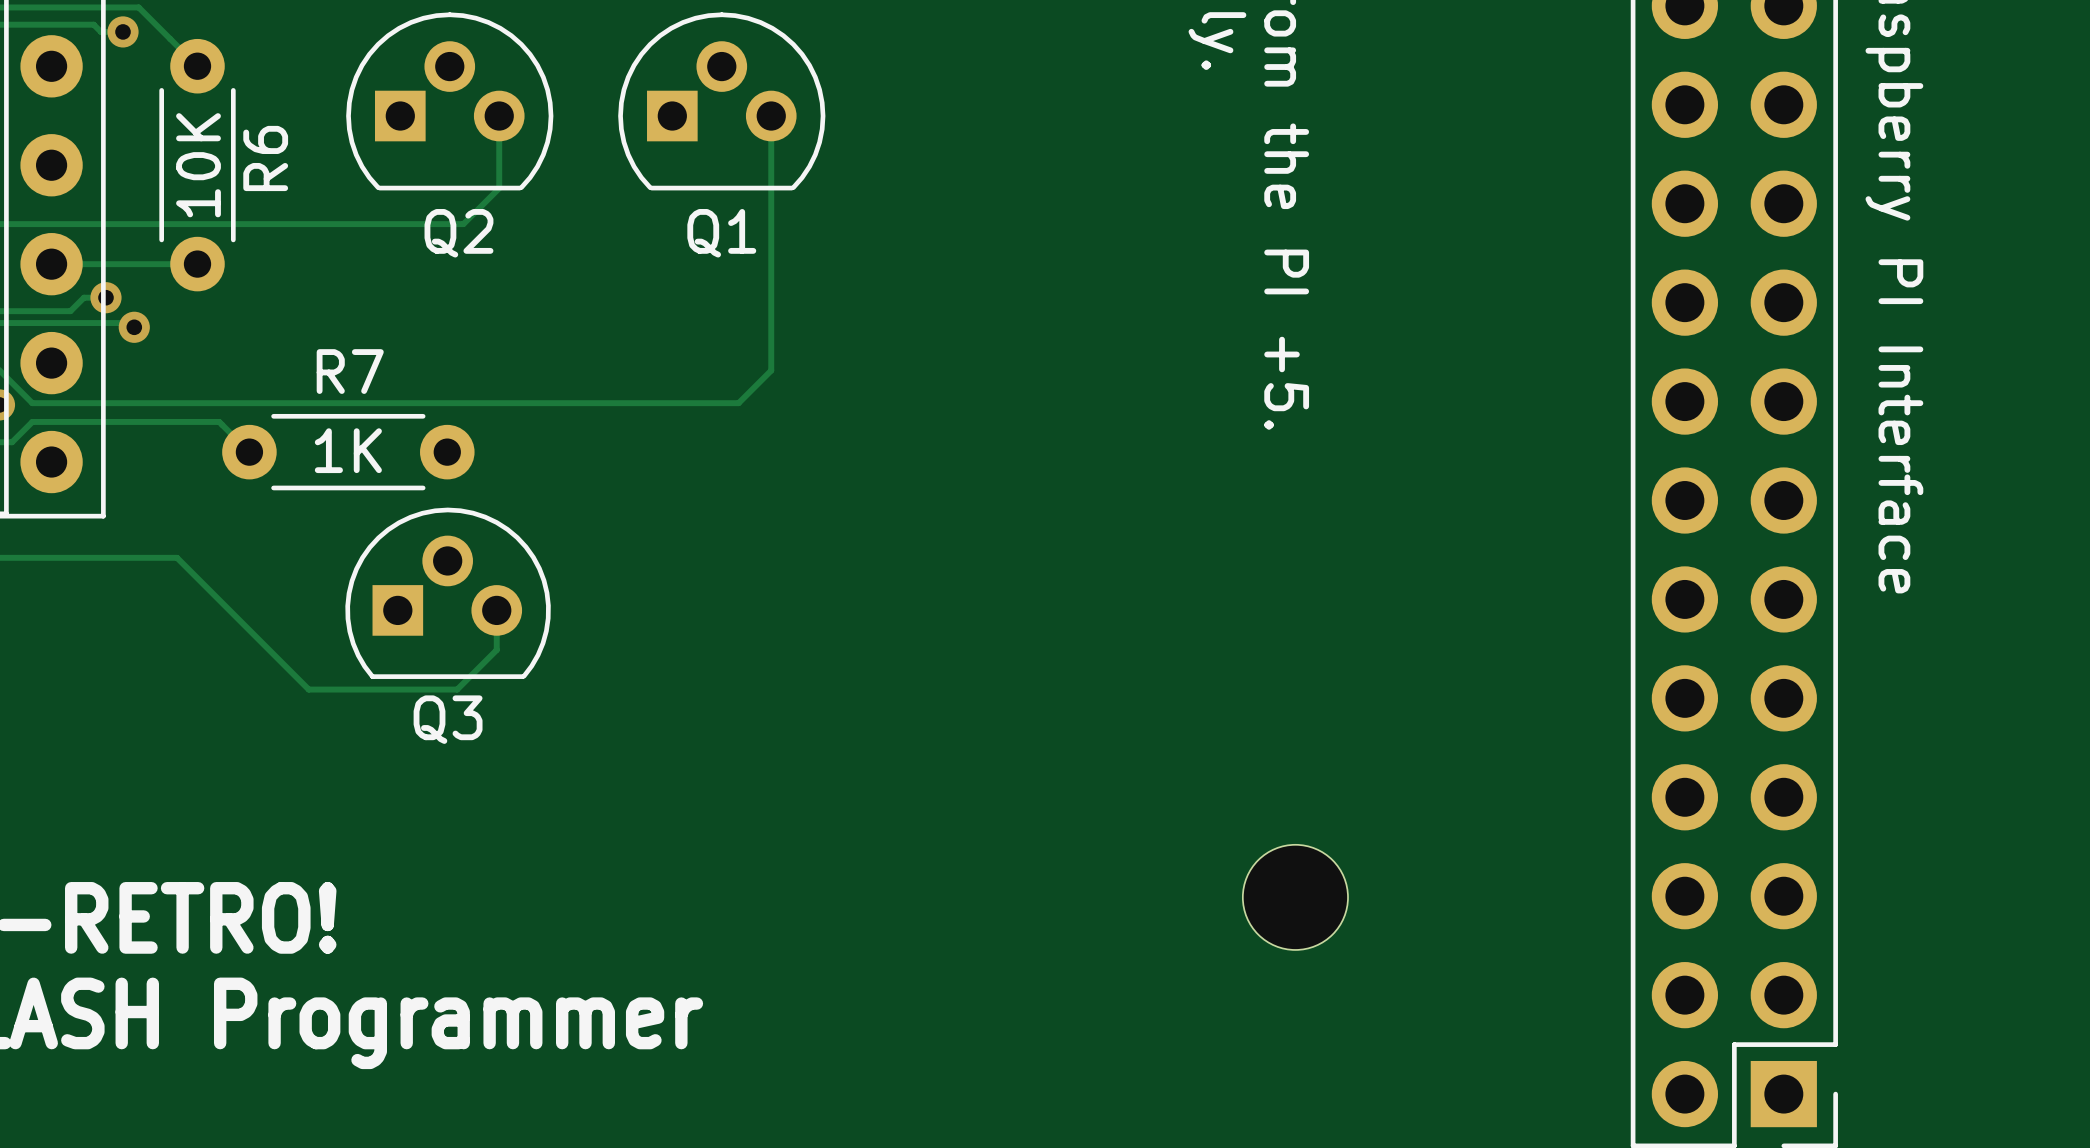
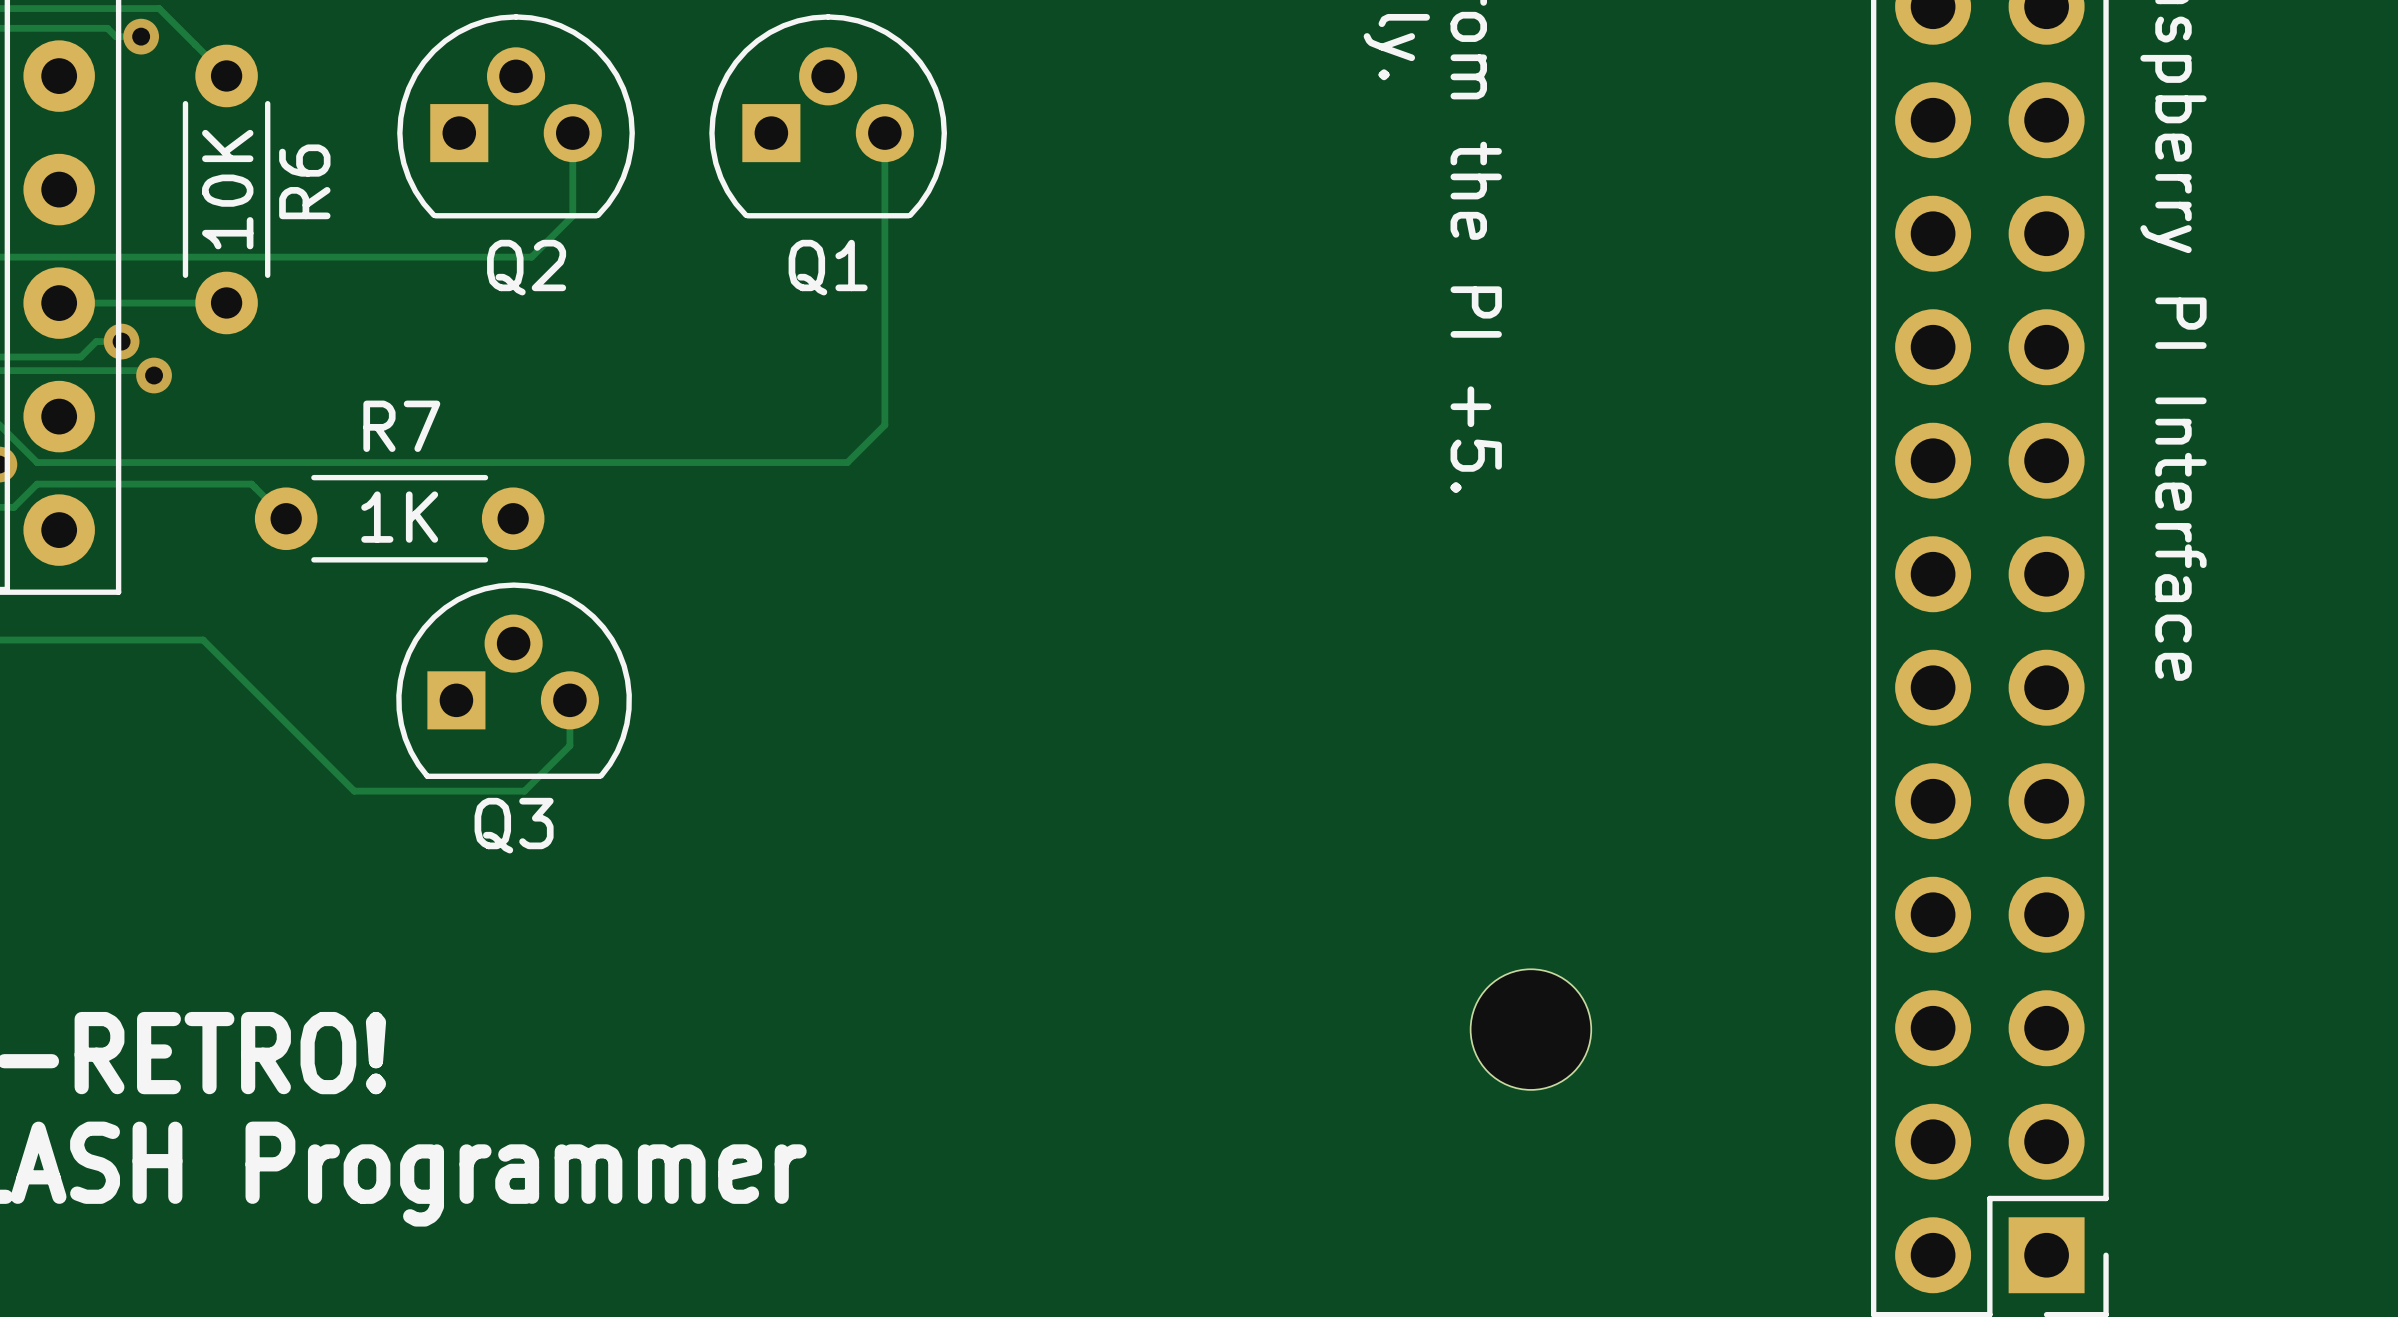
part position: (1295, 897) -> (1530, 1029)

